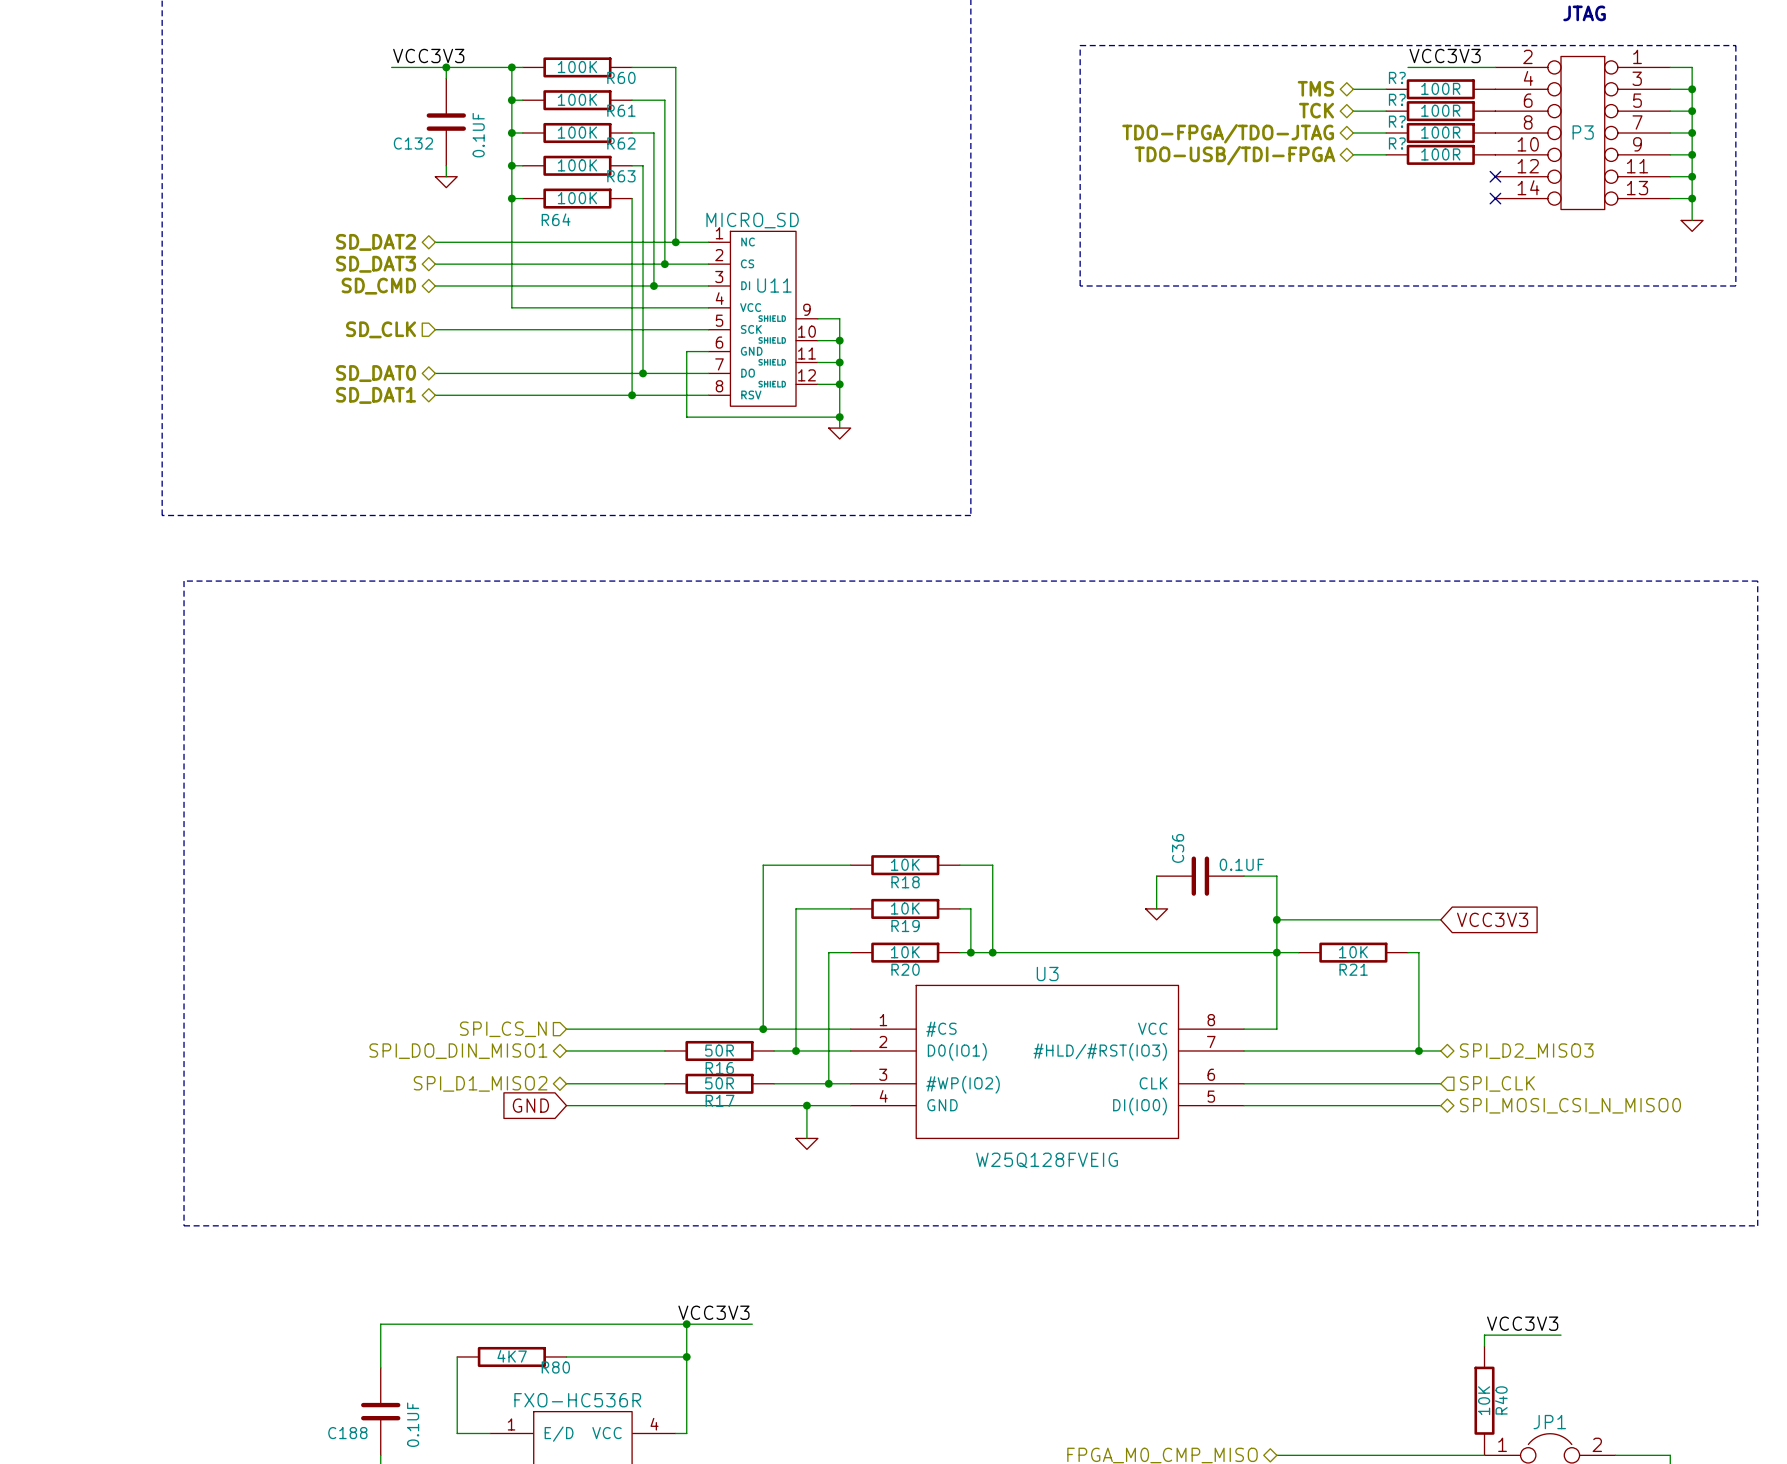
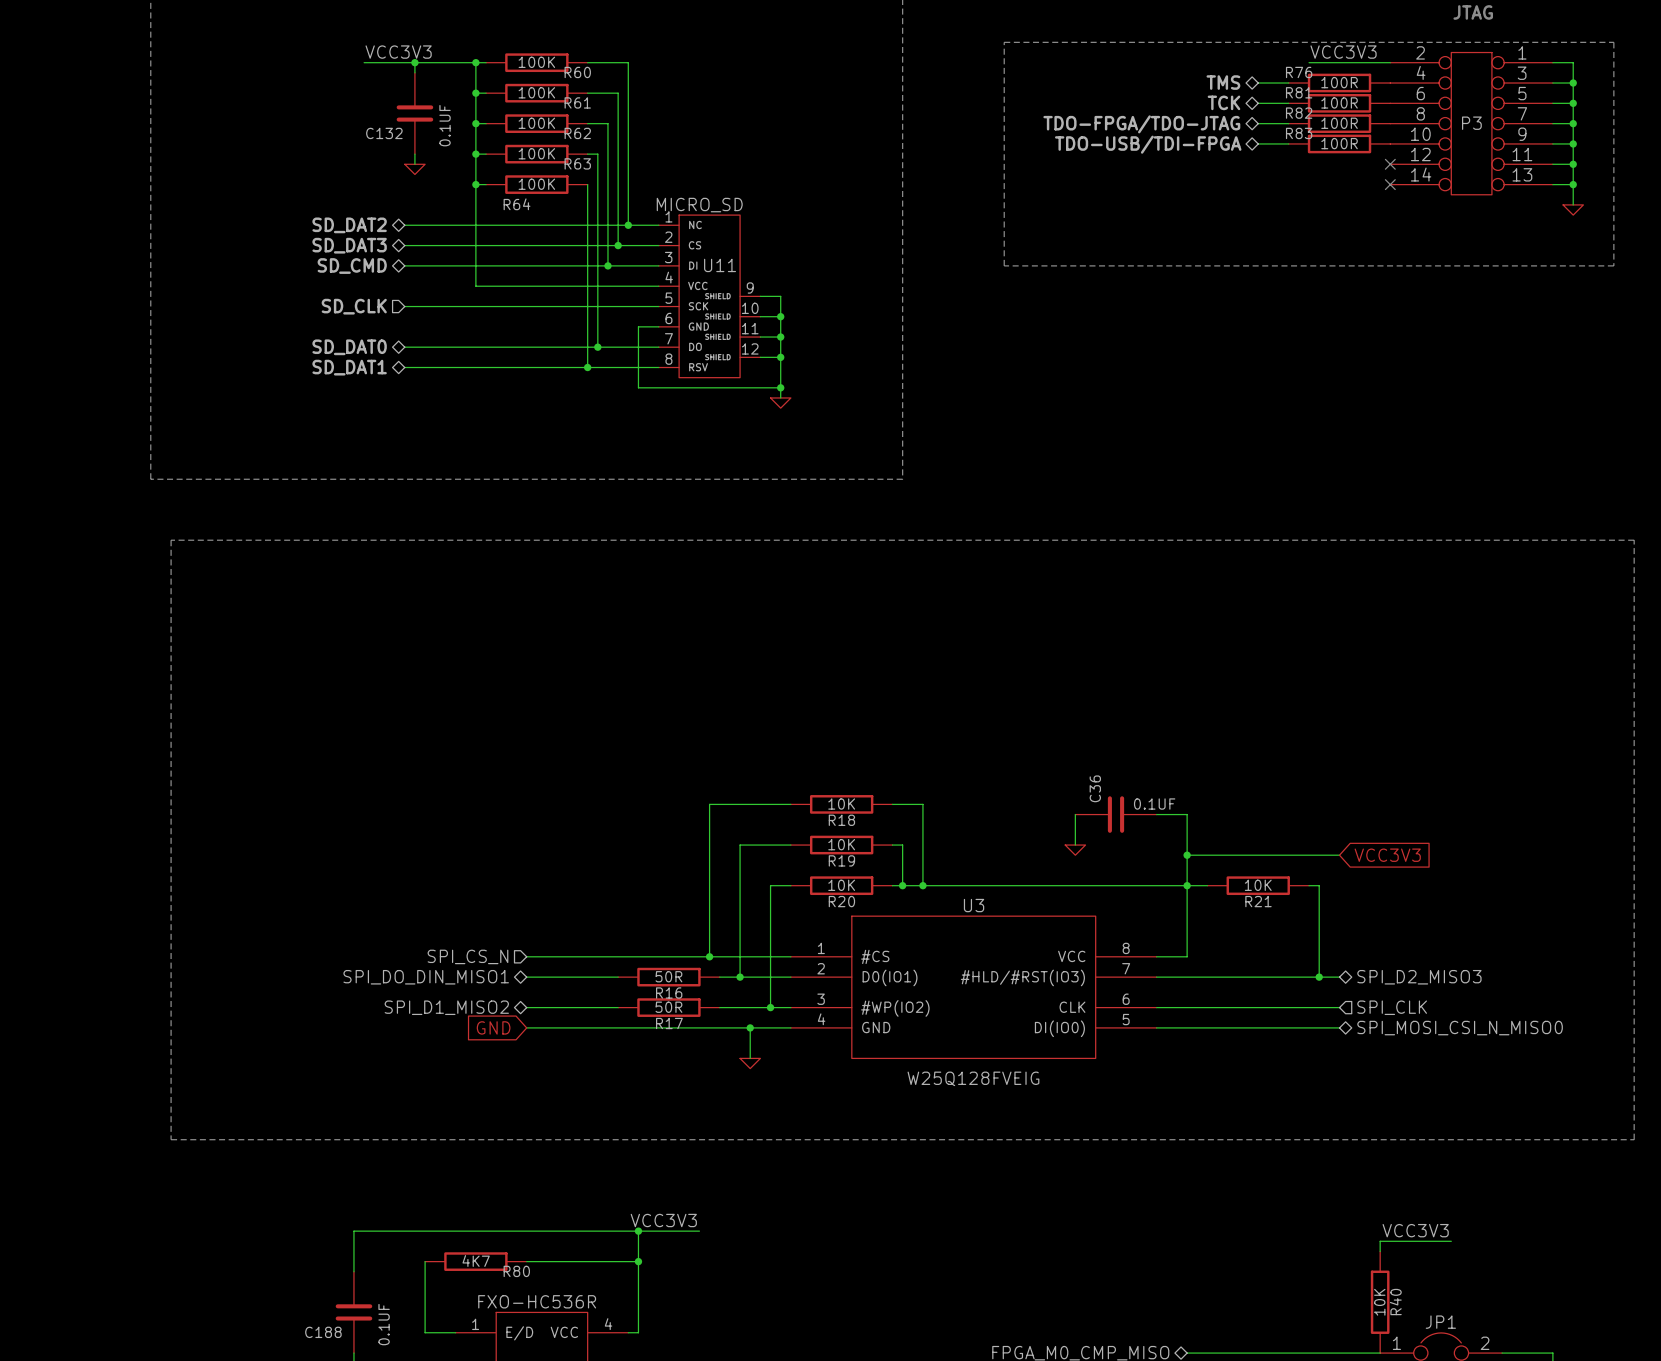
R? name: R? (1397, 77) -> R76 (1299, 72)
R? name: R? (1397, 99) -> R81 (1299, 92)
R? name: R? (1397, 121) -> R82 (1299, 113)
R? name: R? (1397, 143) -> R83 (1299, 133)

